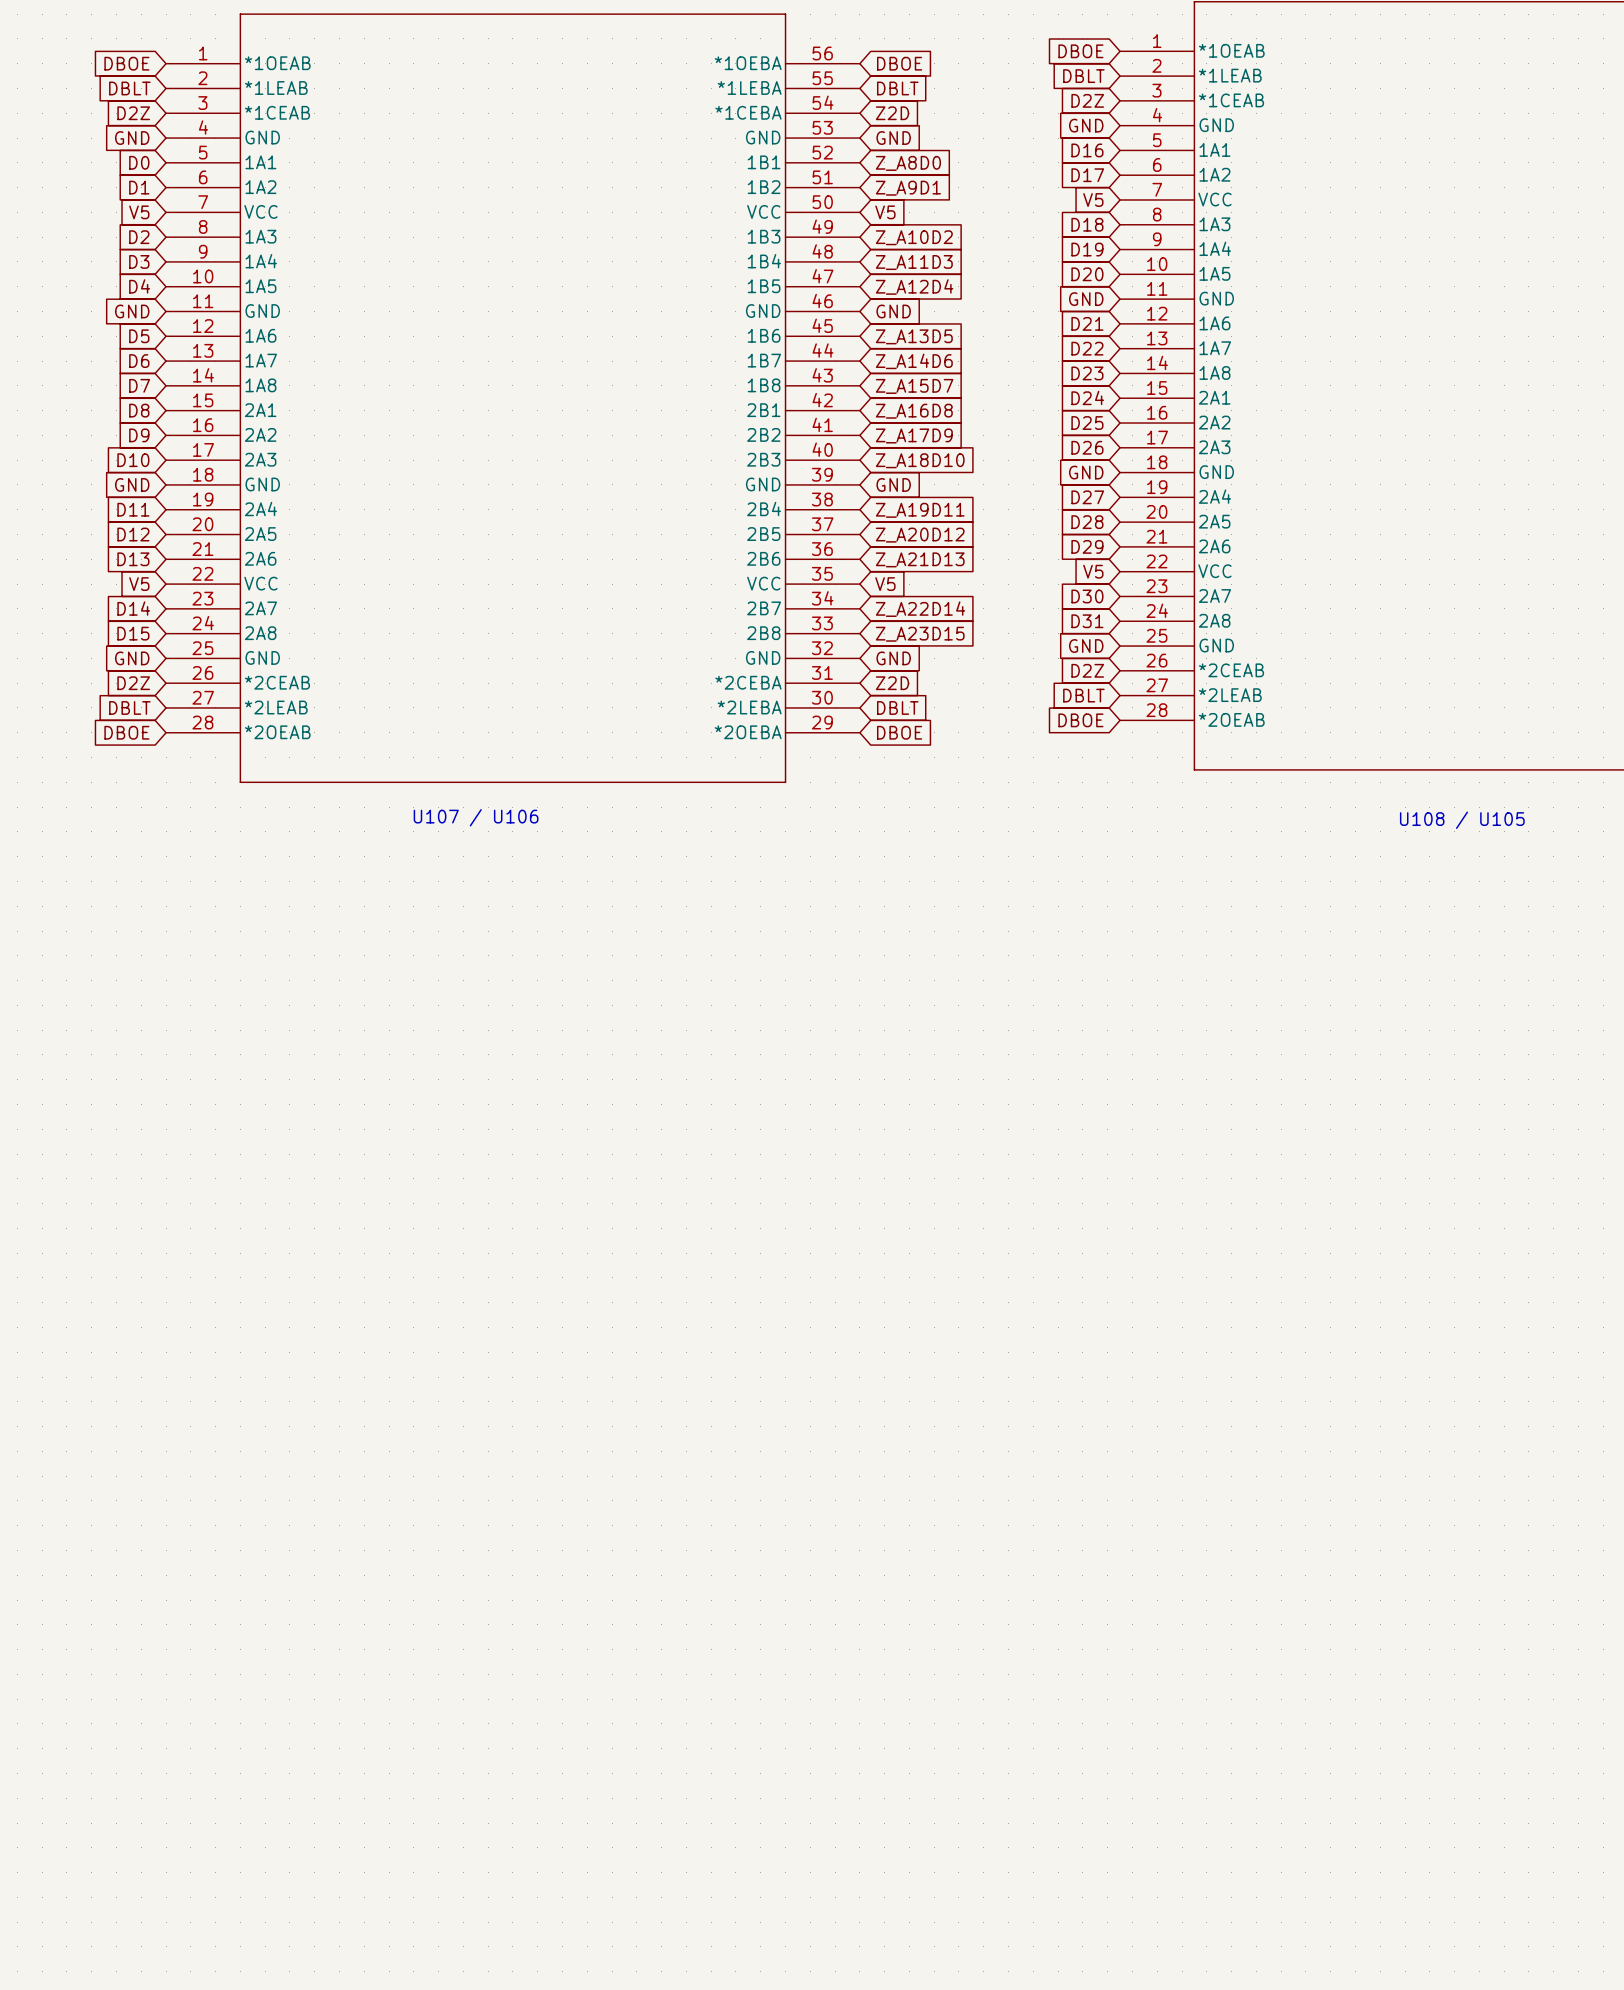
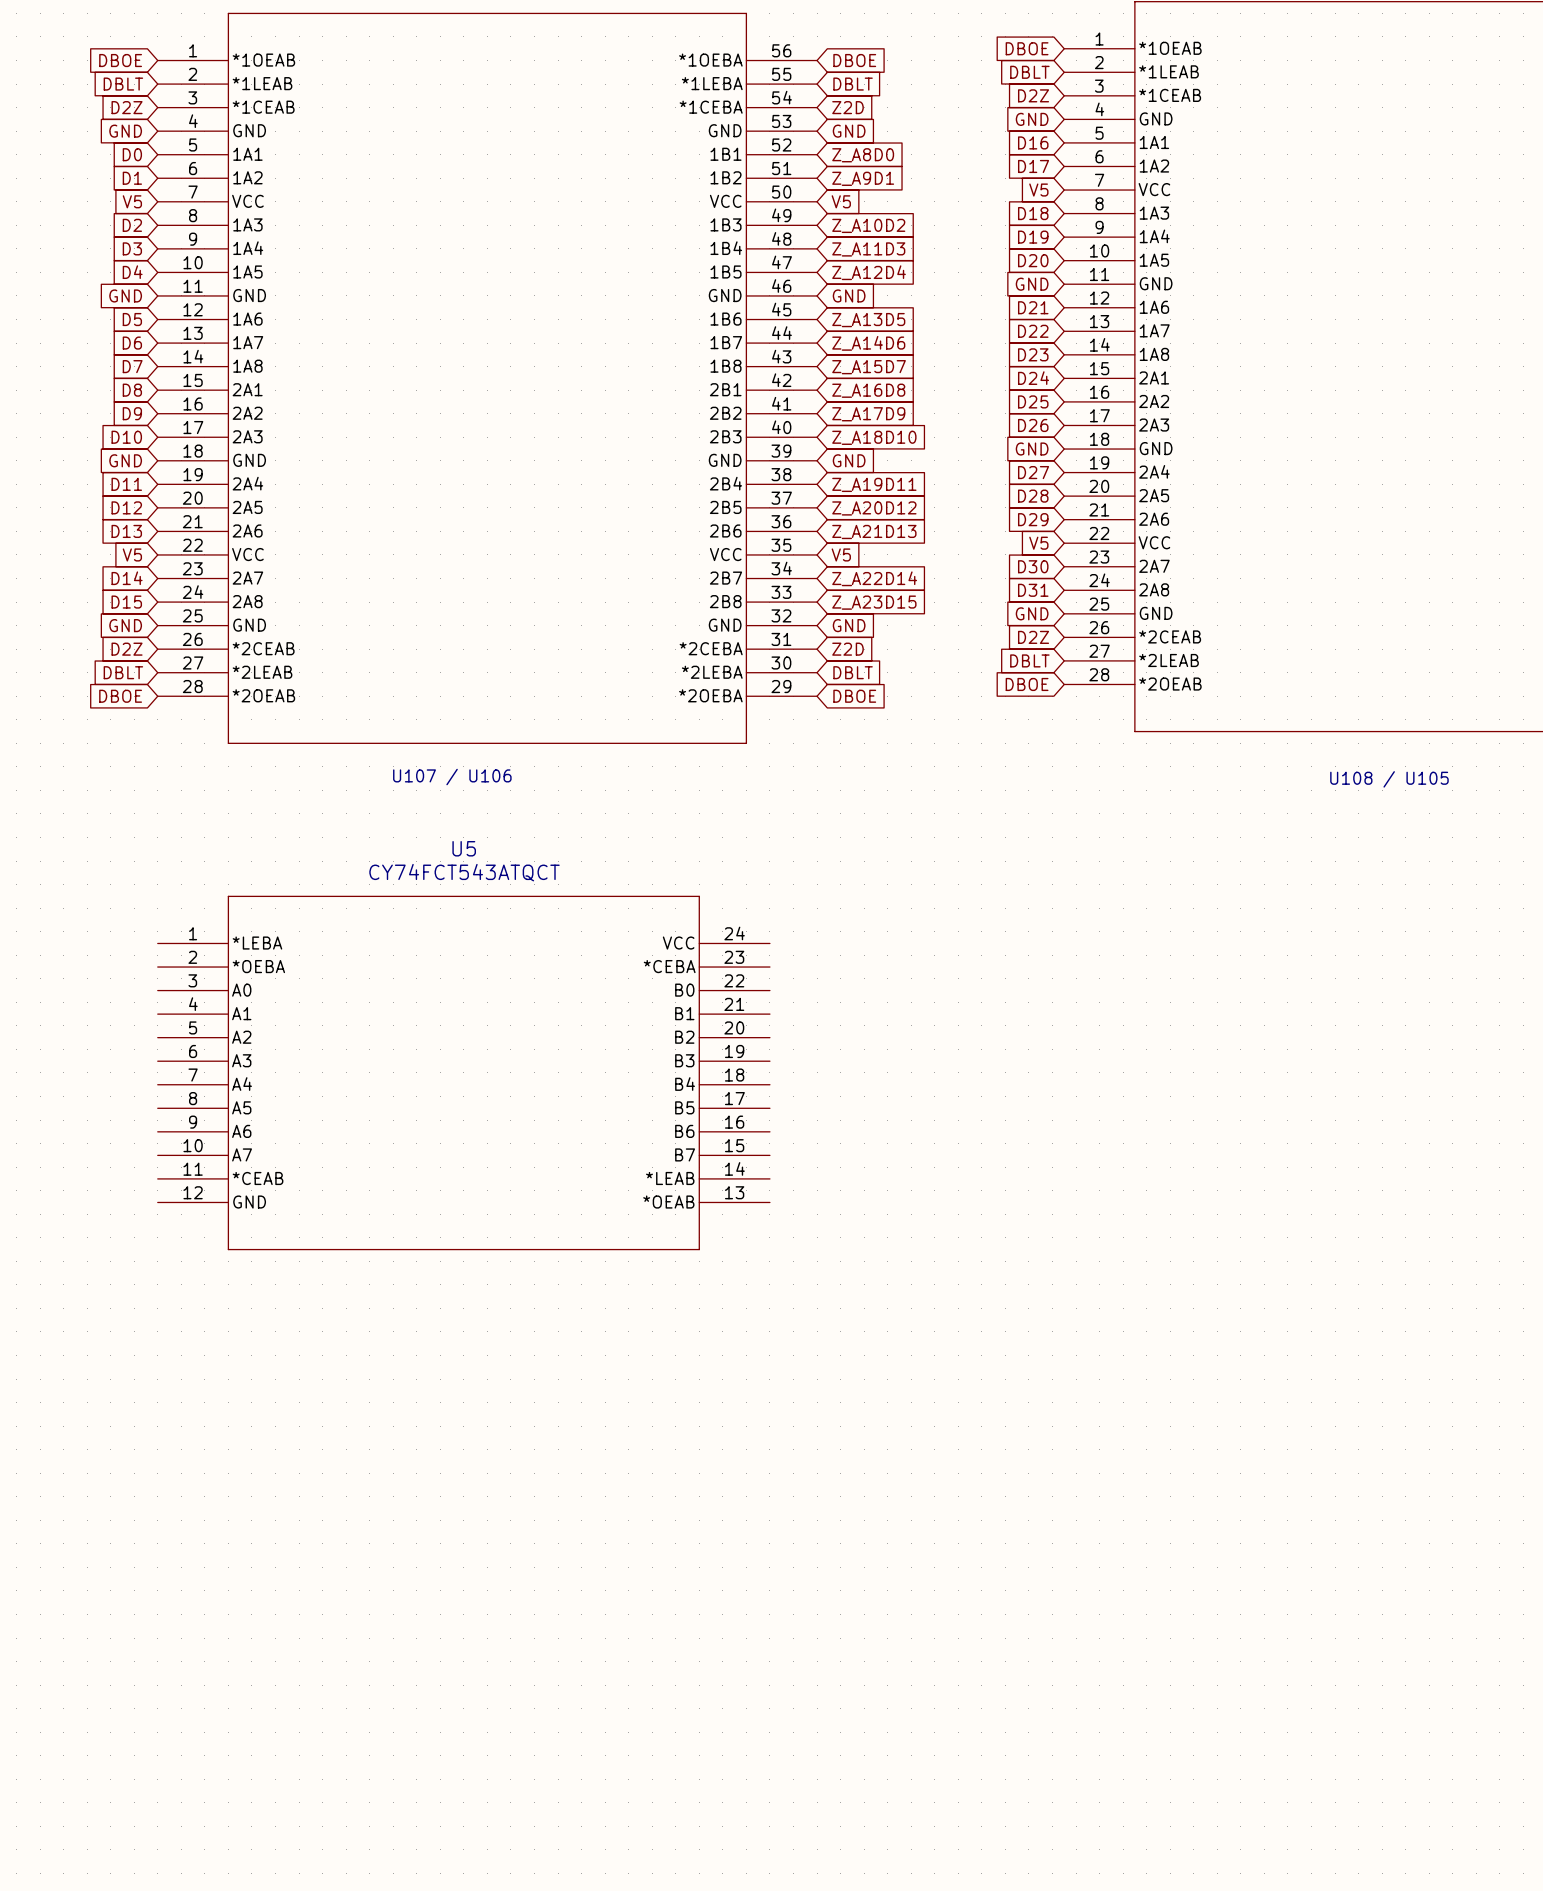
U5: none -> CY74FCT543ATQCT (463, 1072)

